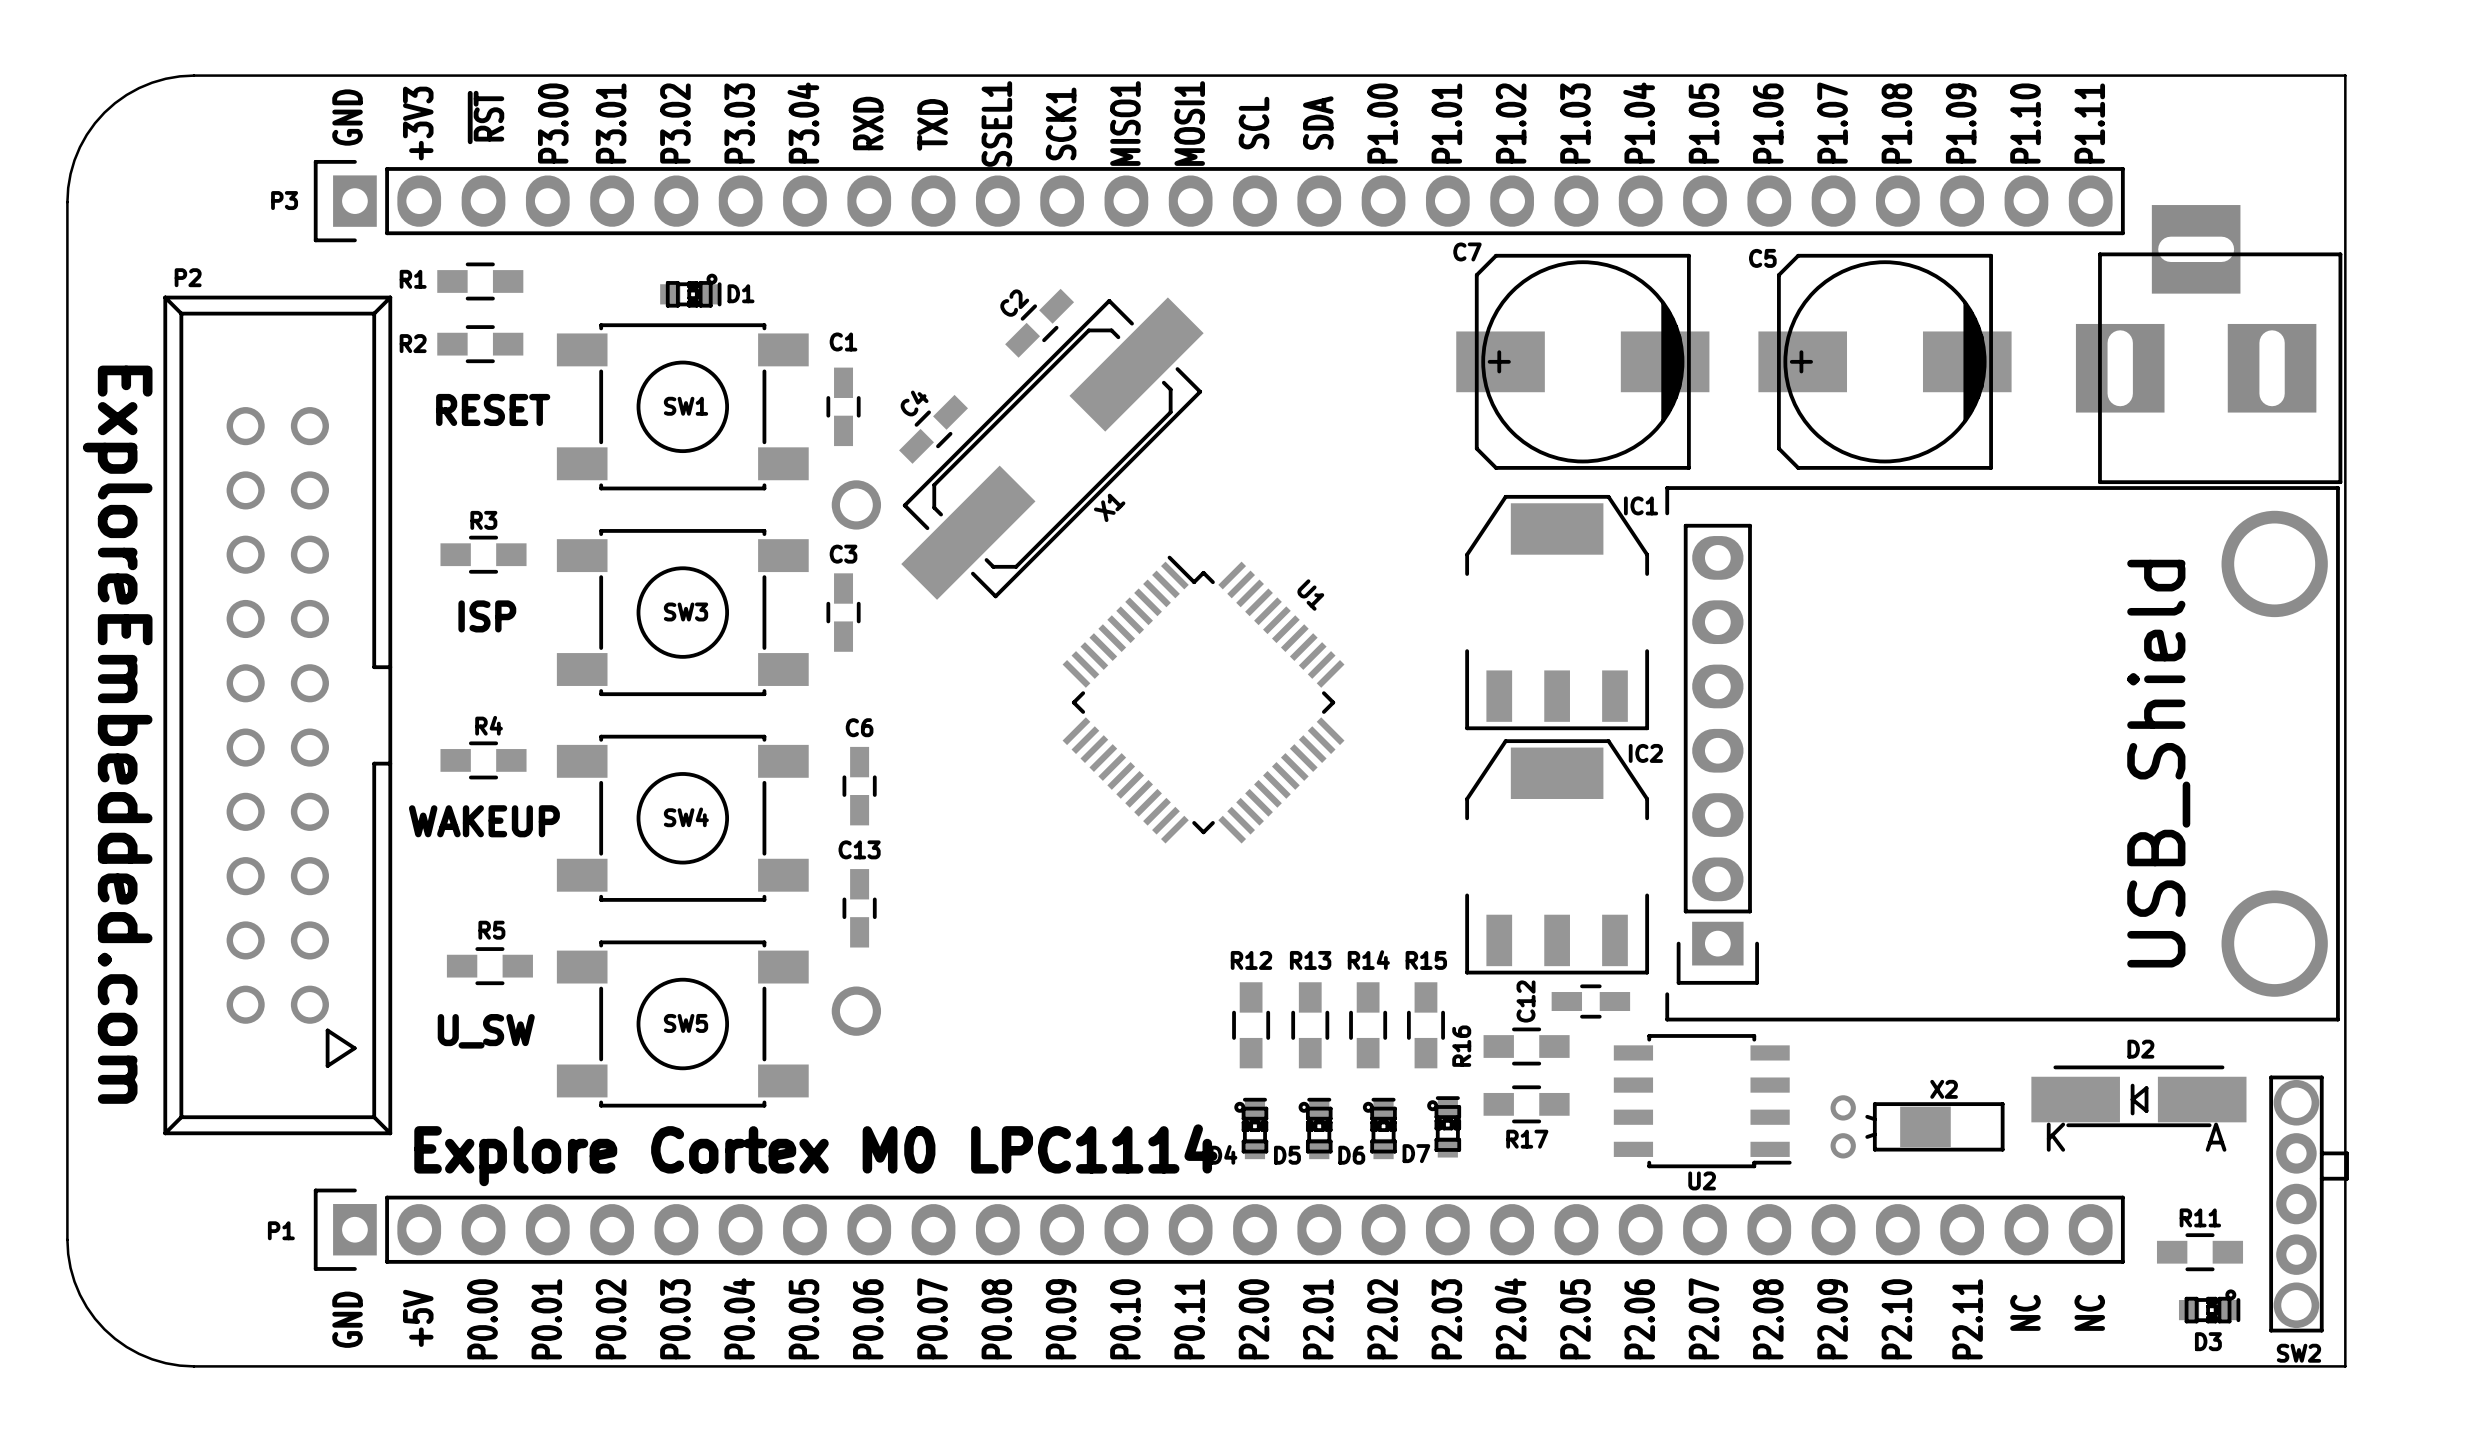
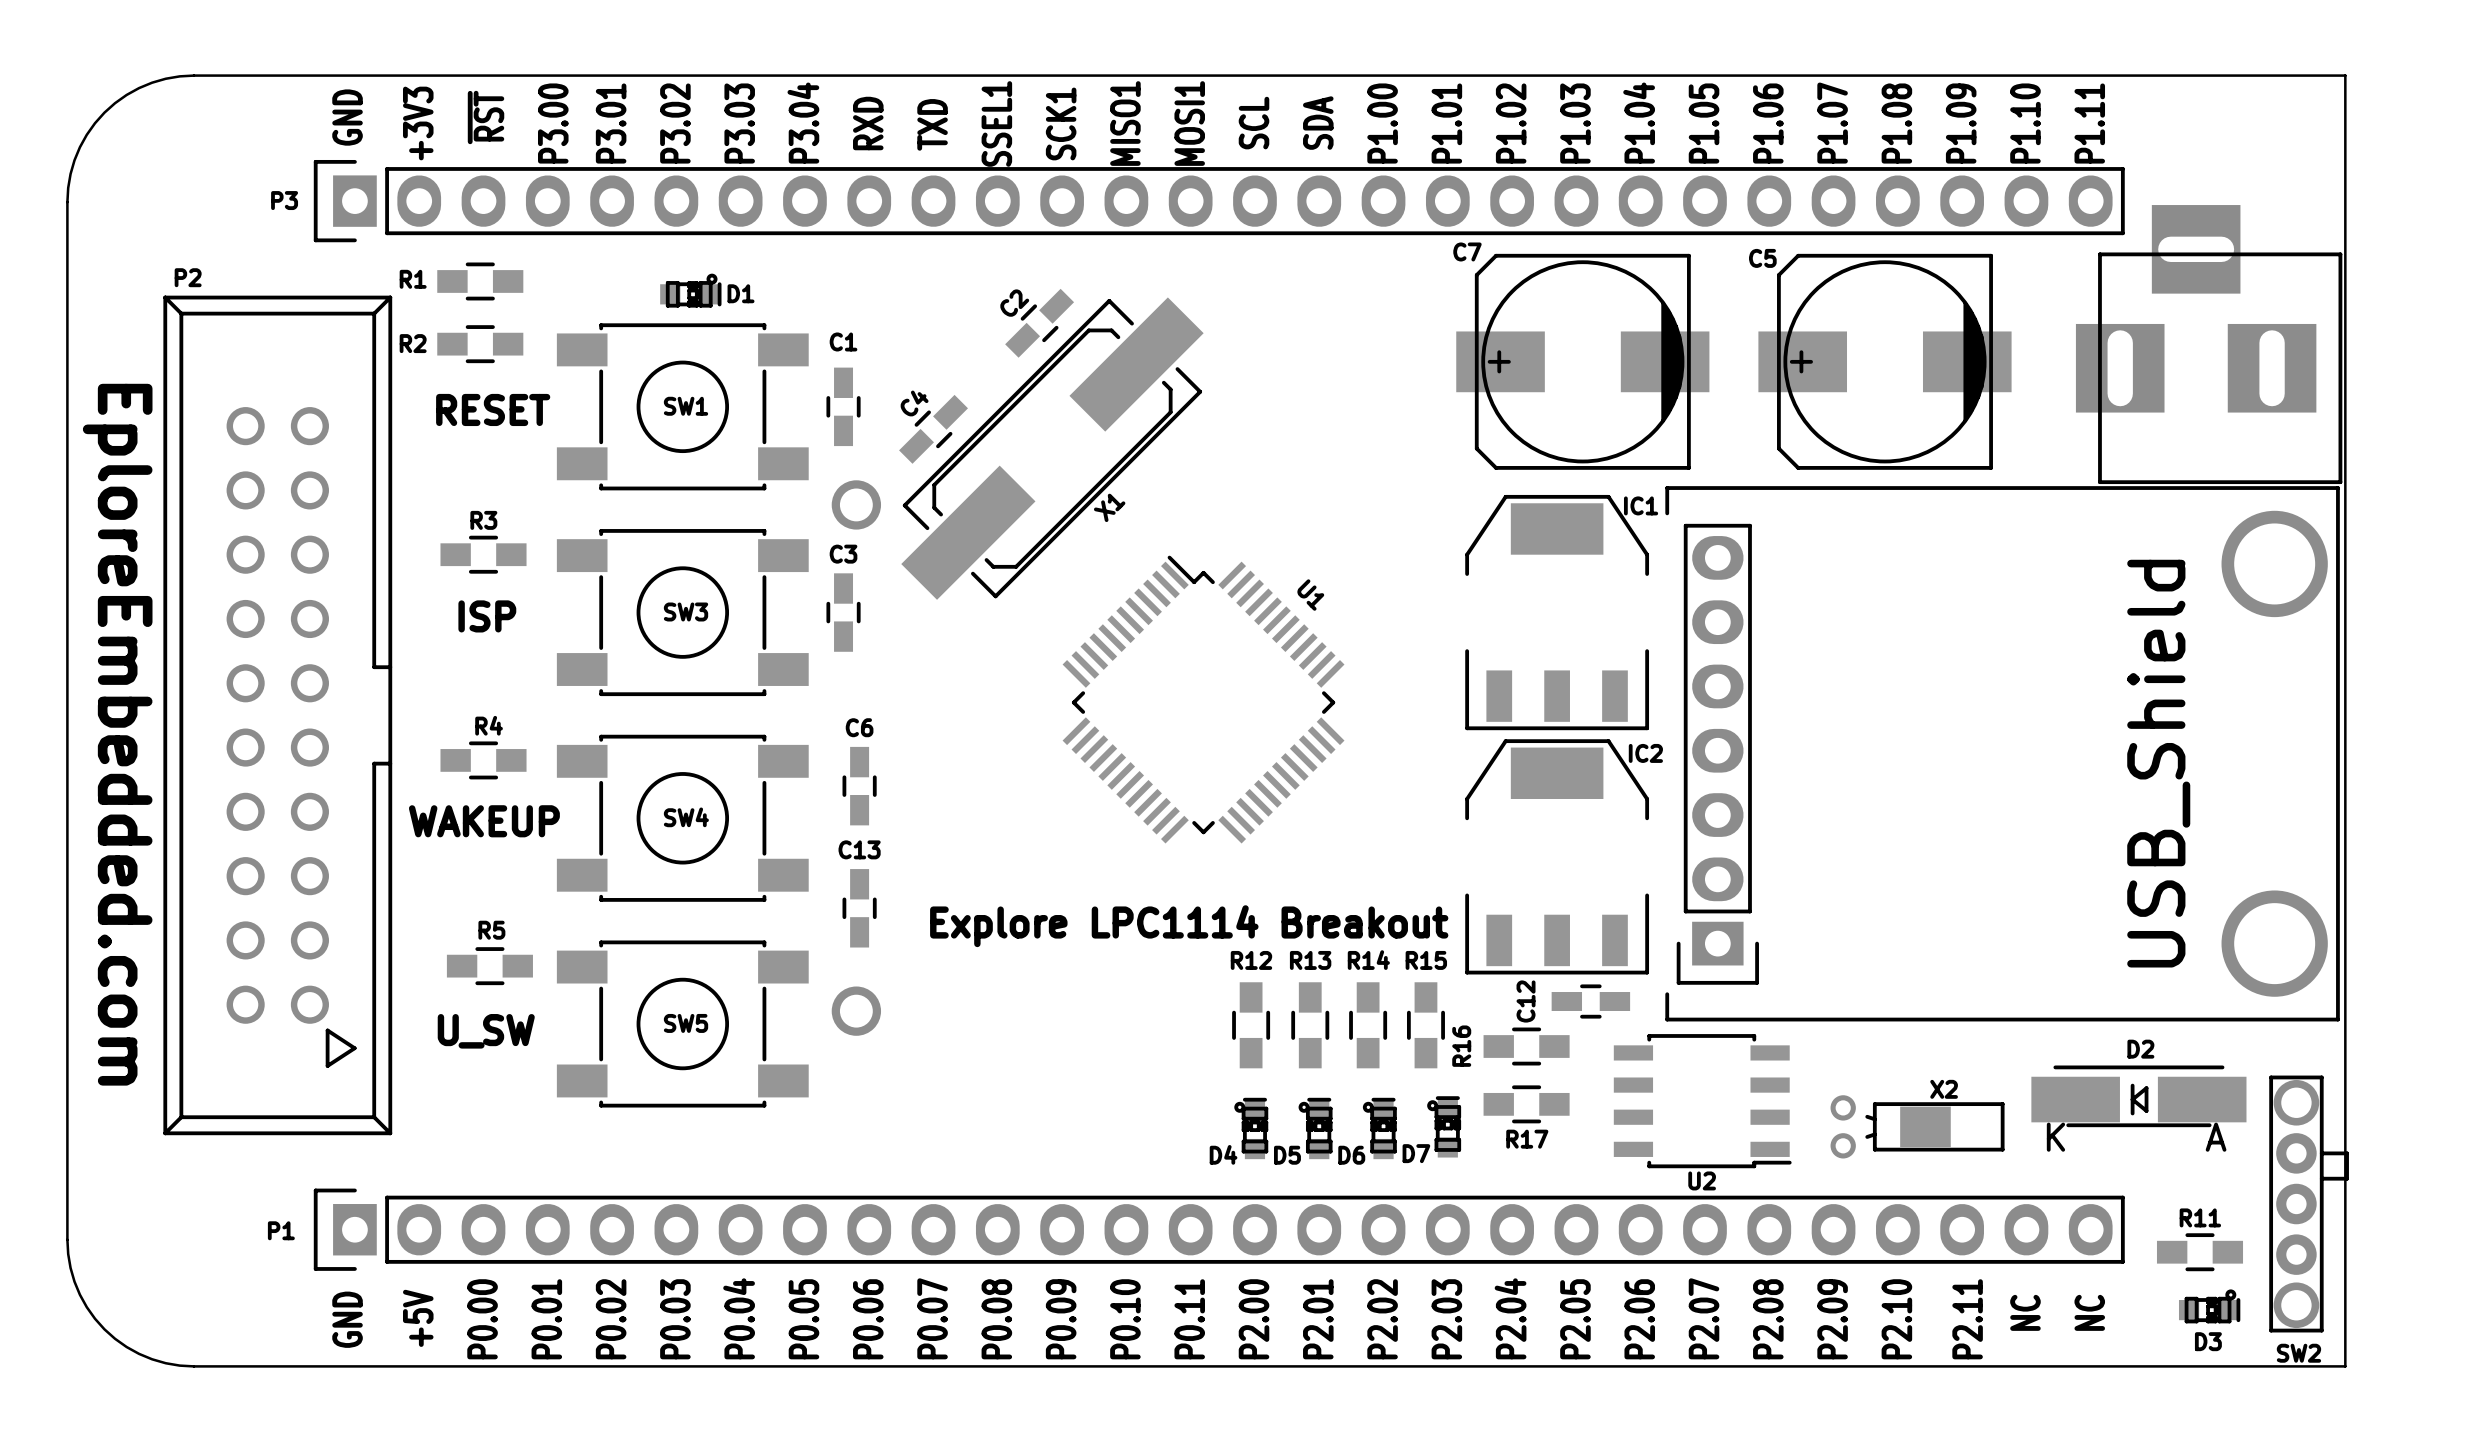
text: ExploreEmbedded.com (117, 734) -> EploreEmbedded.com (117, 734)
text: none -> Explore LPC1114 Breakout (1189, 926)
text: Explore Cortex M0 LPC1114 (815, 1155) -> none

